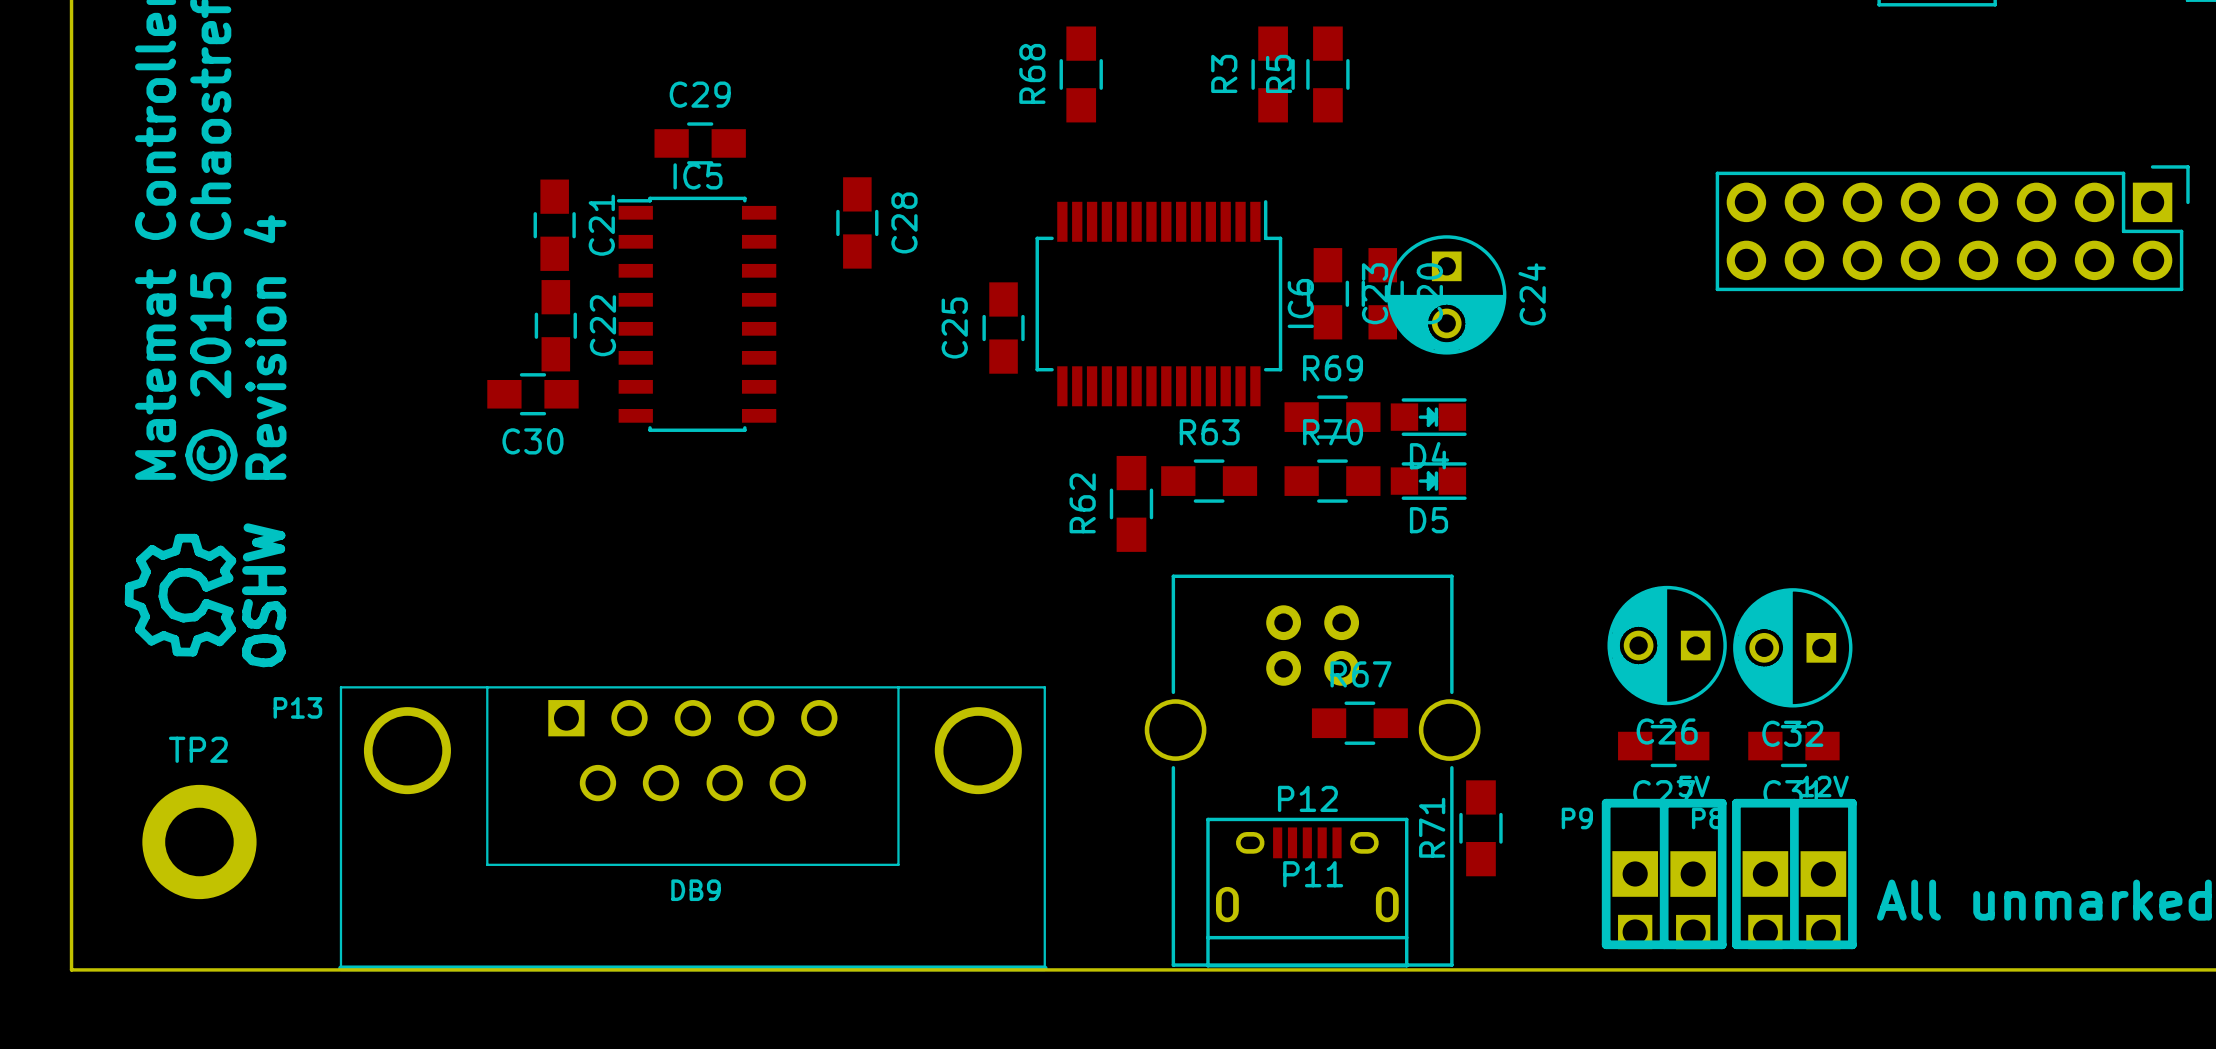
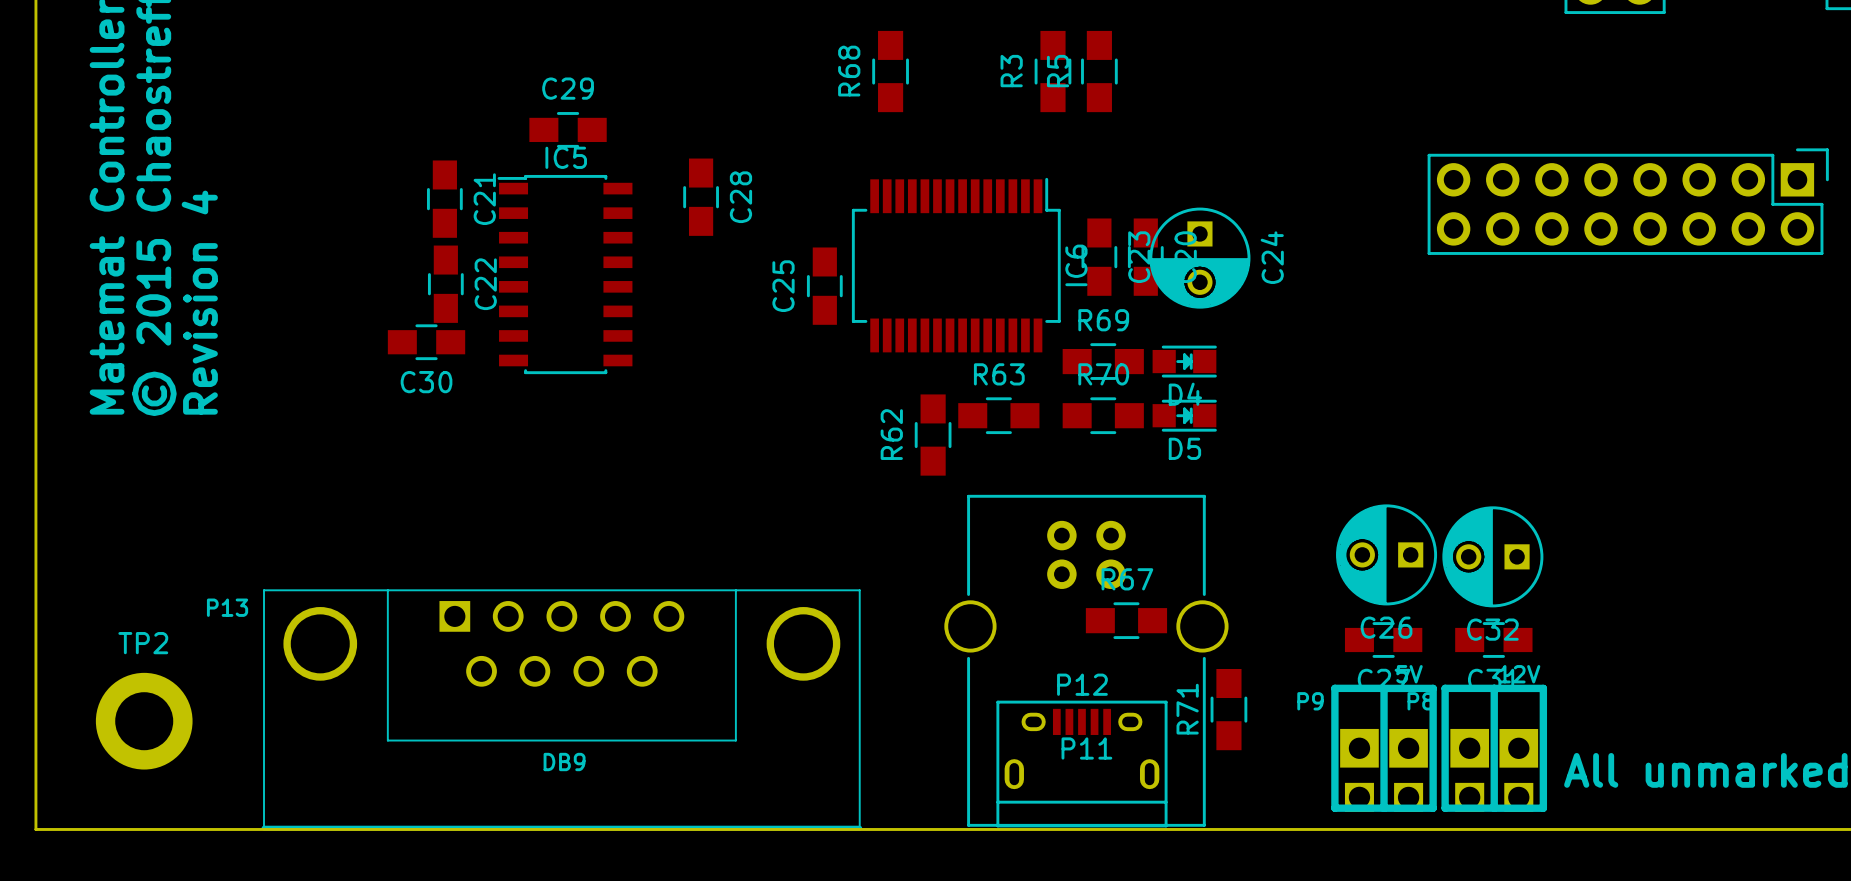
drawing: [124, 523, 287, 668] -> none

